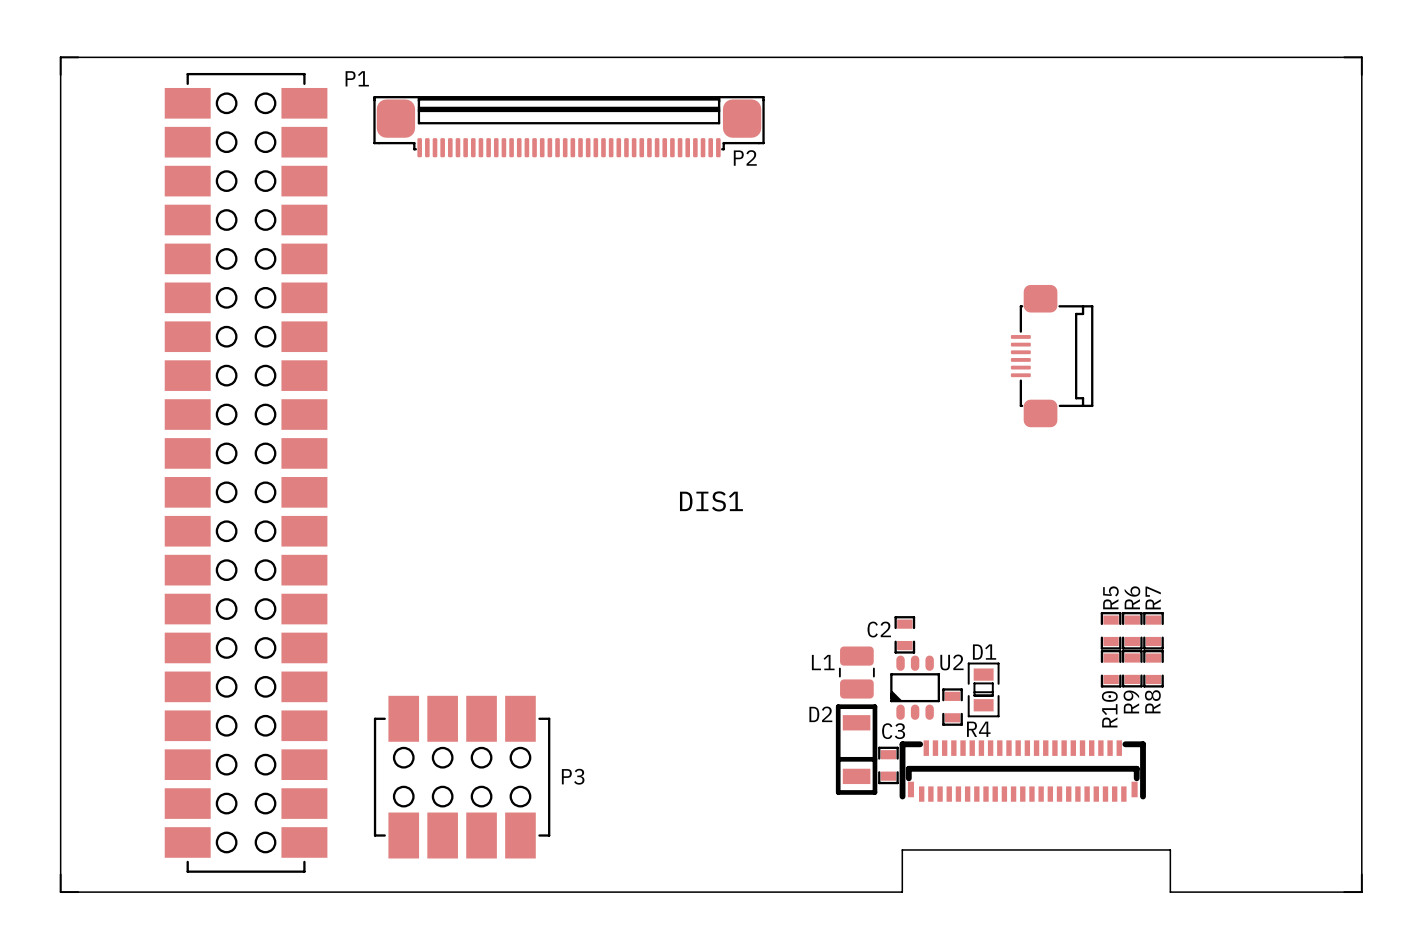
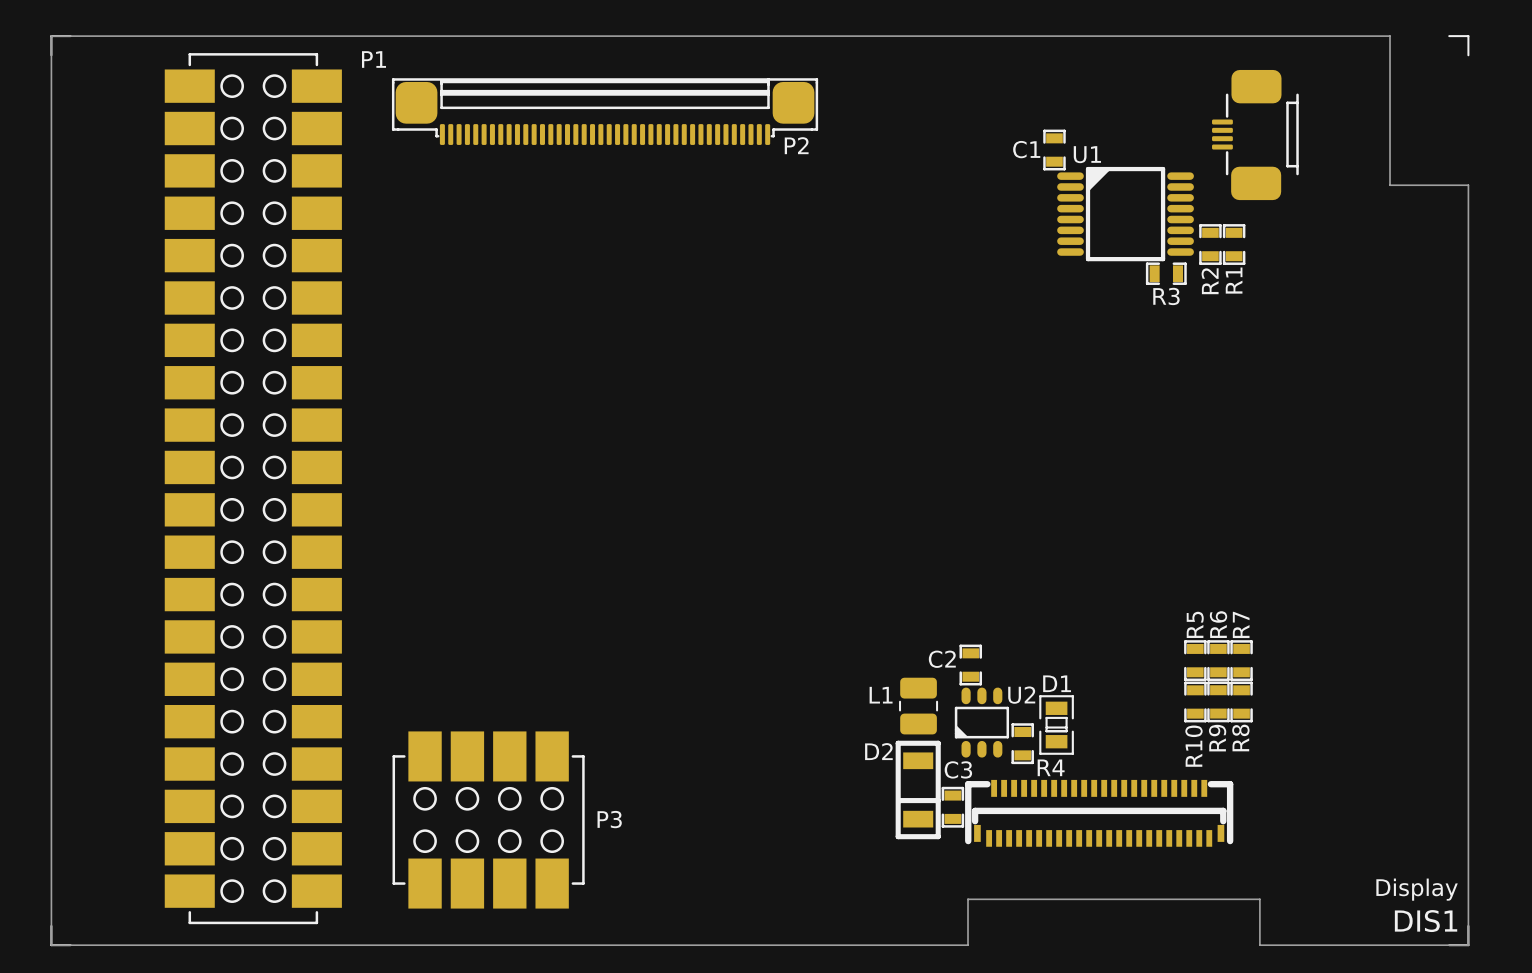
DIS1 footprint: [59, 56, 1363, 894] -> [50, 35, 1470, 947]
board edge: (1289, 57) (1361, 57) (1361, 194) -> (1390, 36) (1390, 185) (1468, 185)
C1: none -> (1054, 150)
U1: none -> (1125, 214)
R2: none -> (1210, 244)
R1: none -> (1234, 244)
R3: none -> (1166, 273)
DIS1 name position: DIS1 (711, 501) -> DIS1 (1426, 921)

